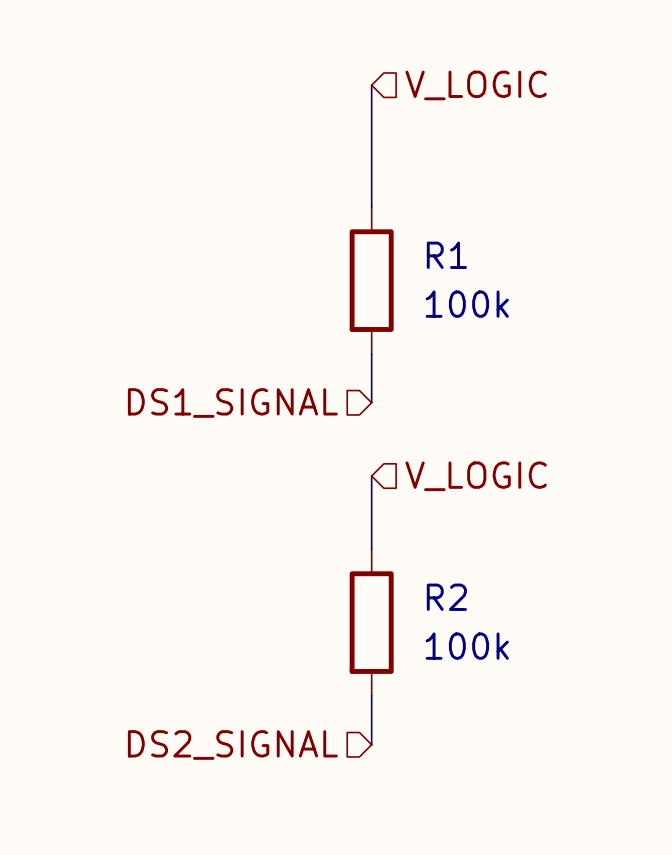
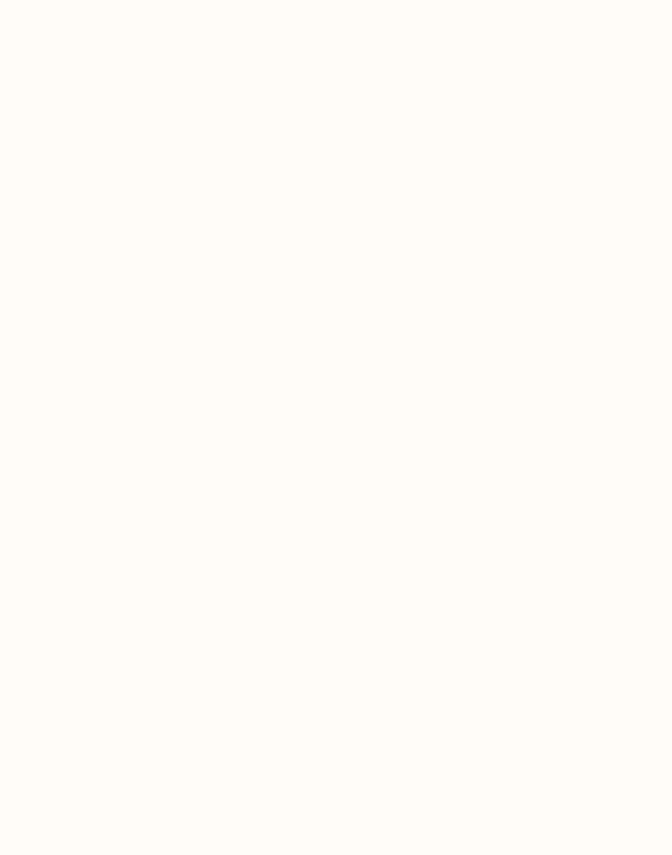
wire: (371, 85) (371, 207) -> none
hierarchical label: V_LOGIC (476, 85) -> none
R1: 100k (371, 280) -> none
wire: (371, 353) (371, 402) -> none
hierarchical label: DS1_SIGNAL (232, 403) -> none
wire: (371, 476) (371, 549) -> none
hierarchical label: V_LOGIC (476, 476) -> none
R2: 100k (371, 622) -> none
wire: (371, 695) (371, 744) -> none
hierarchical label: DS2_SIGNAL (232, 744) -> none

